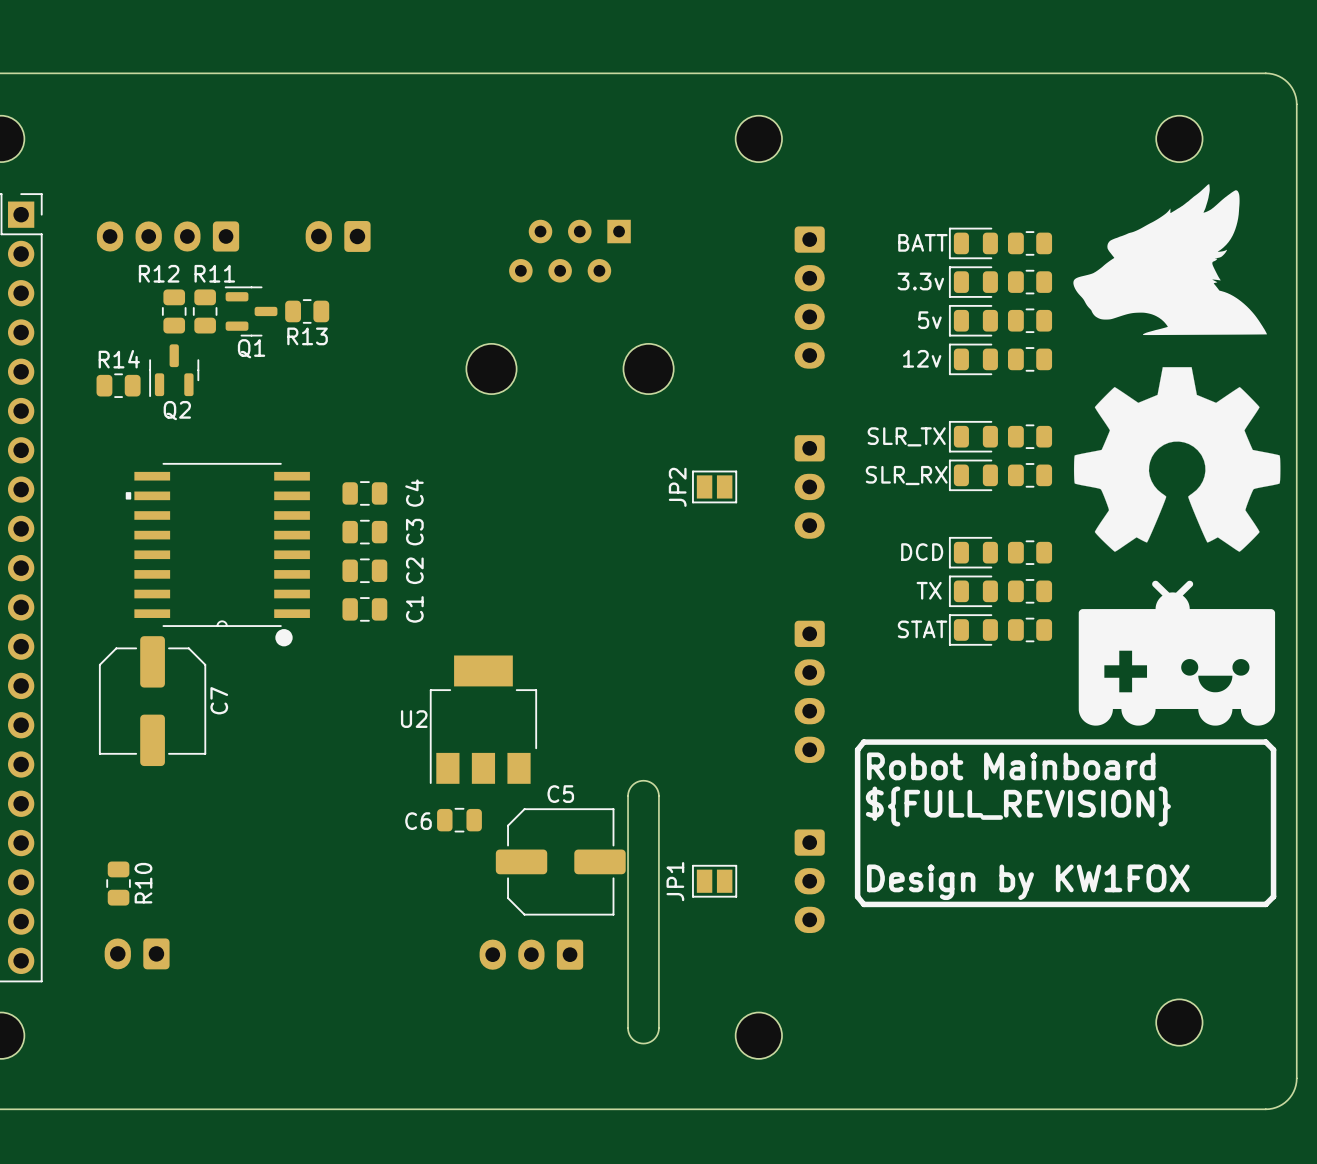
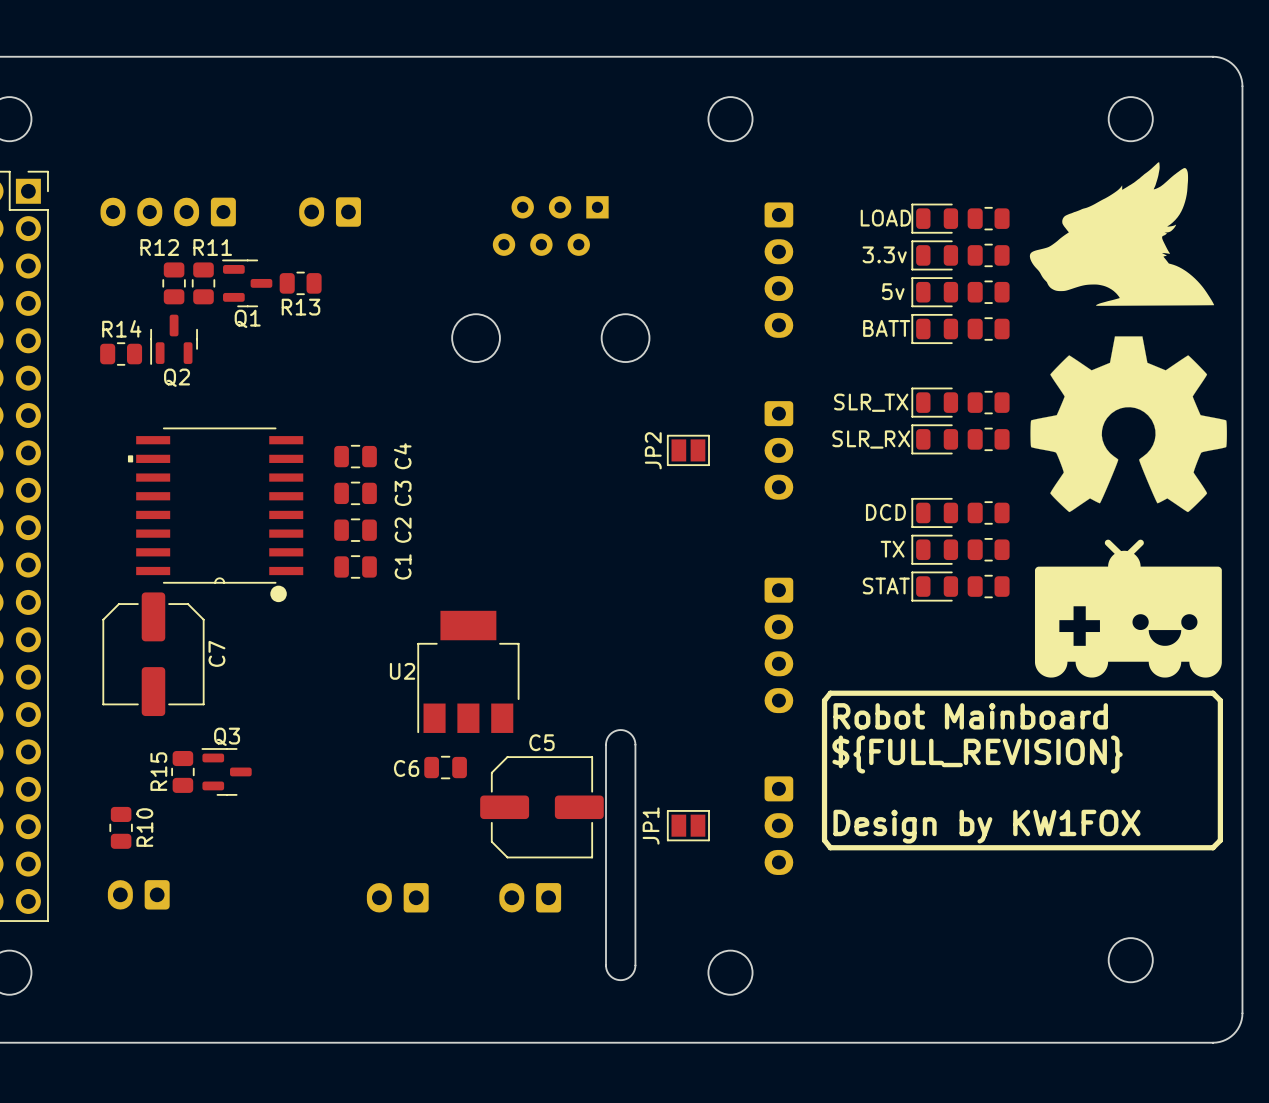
part value: BATT (922, 242) -> LOAD (885, 218)
part value: 12v (922, 358) -> BATT (886, 328)
R15: none -> (182, 771)
Q3: none -> (226, 771)
part: (531, 954) -> none
part: none -> (397, 897)
part: none -> (530, 897)

